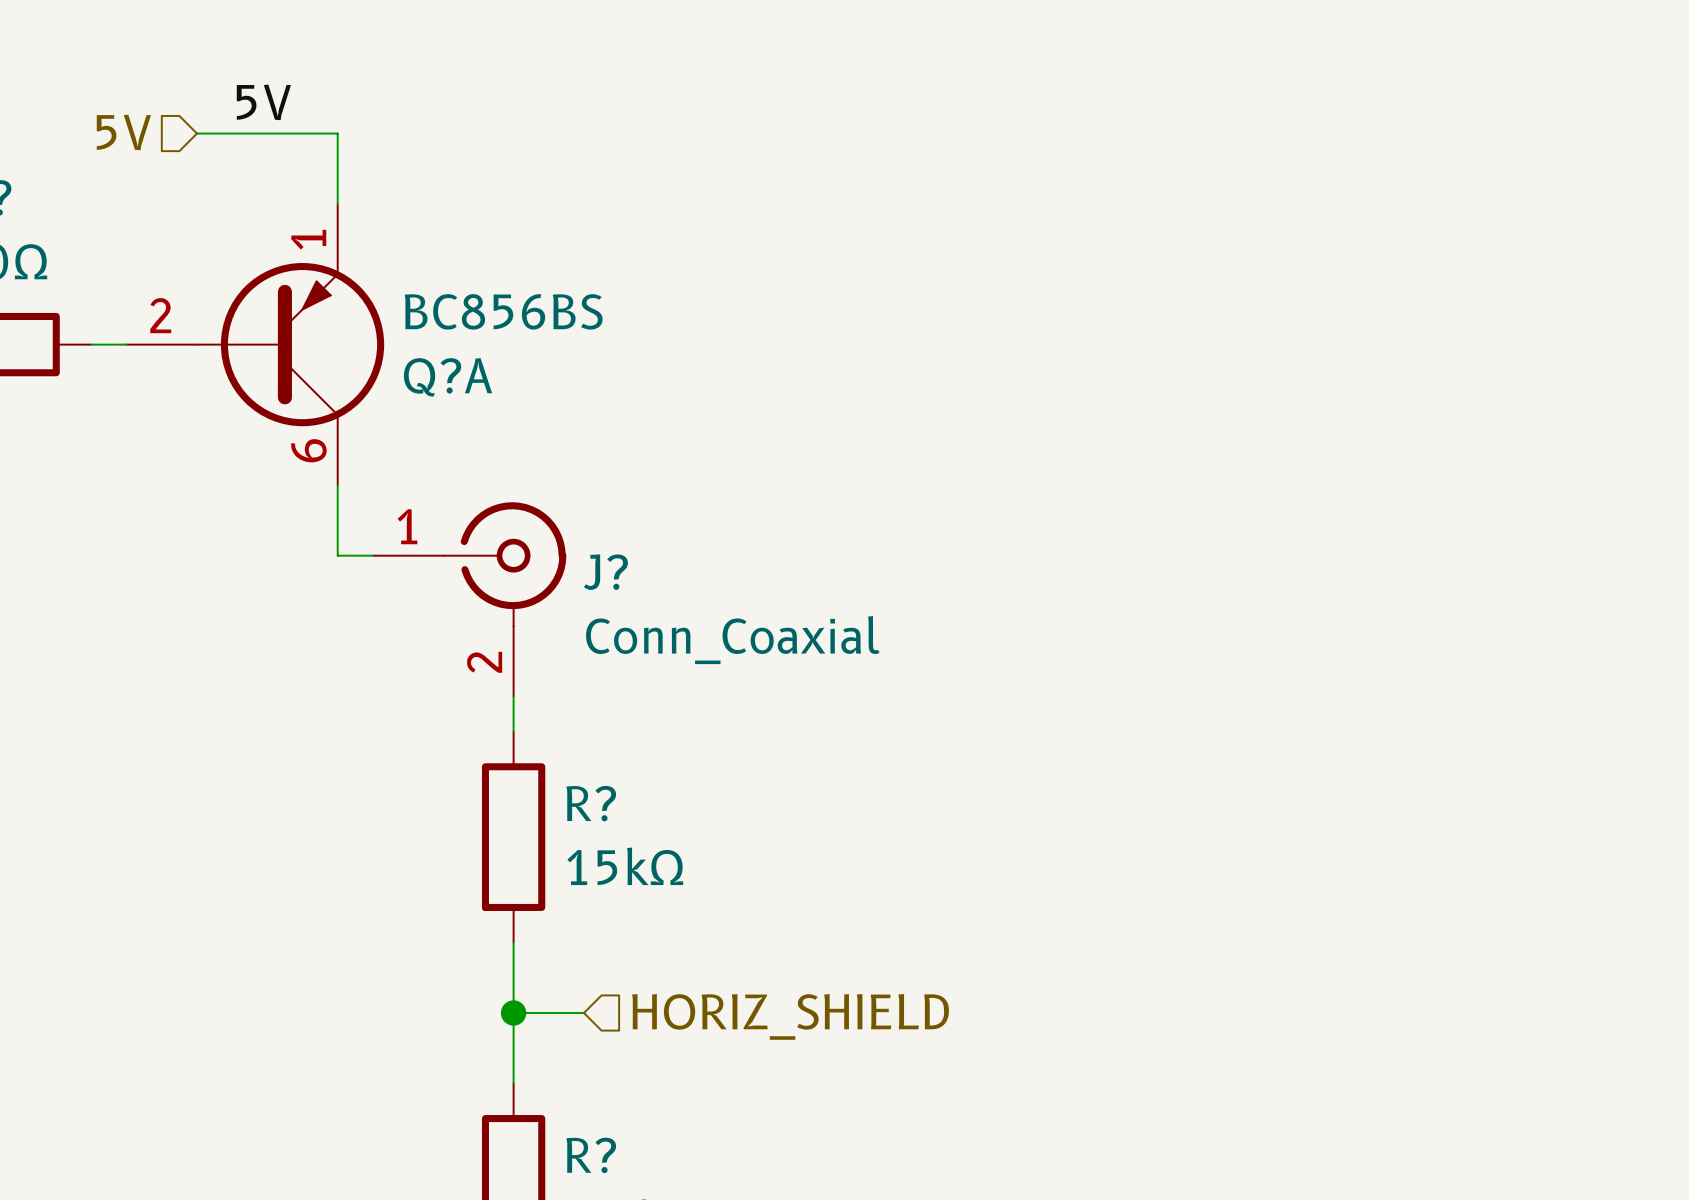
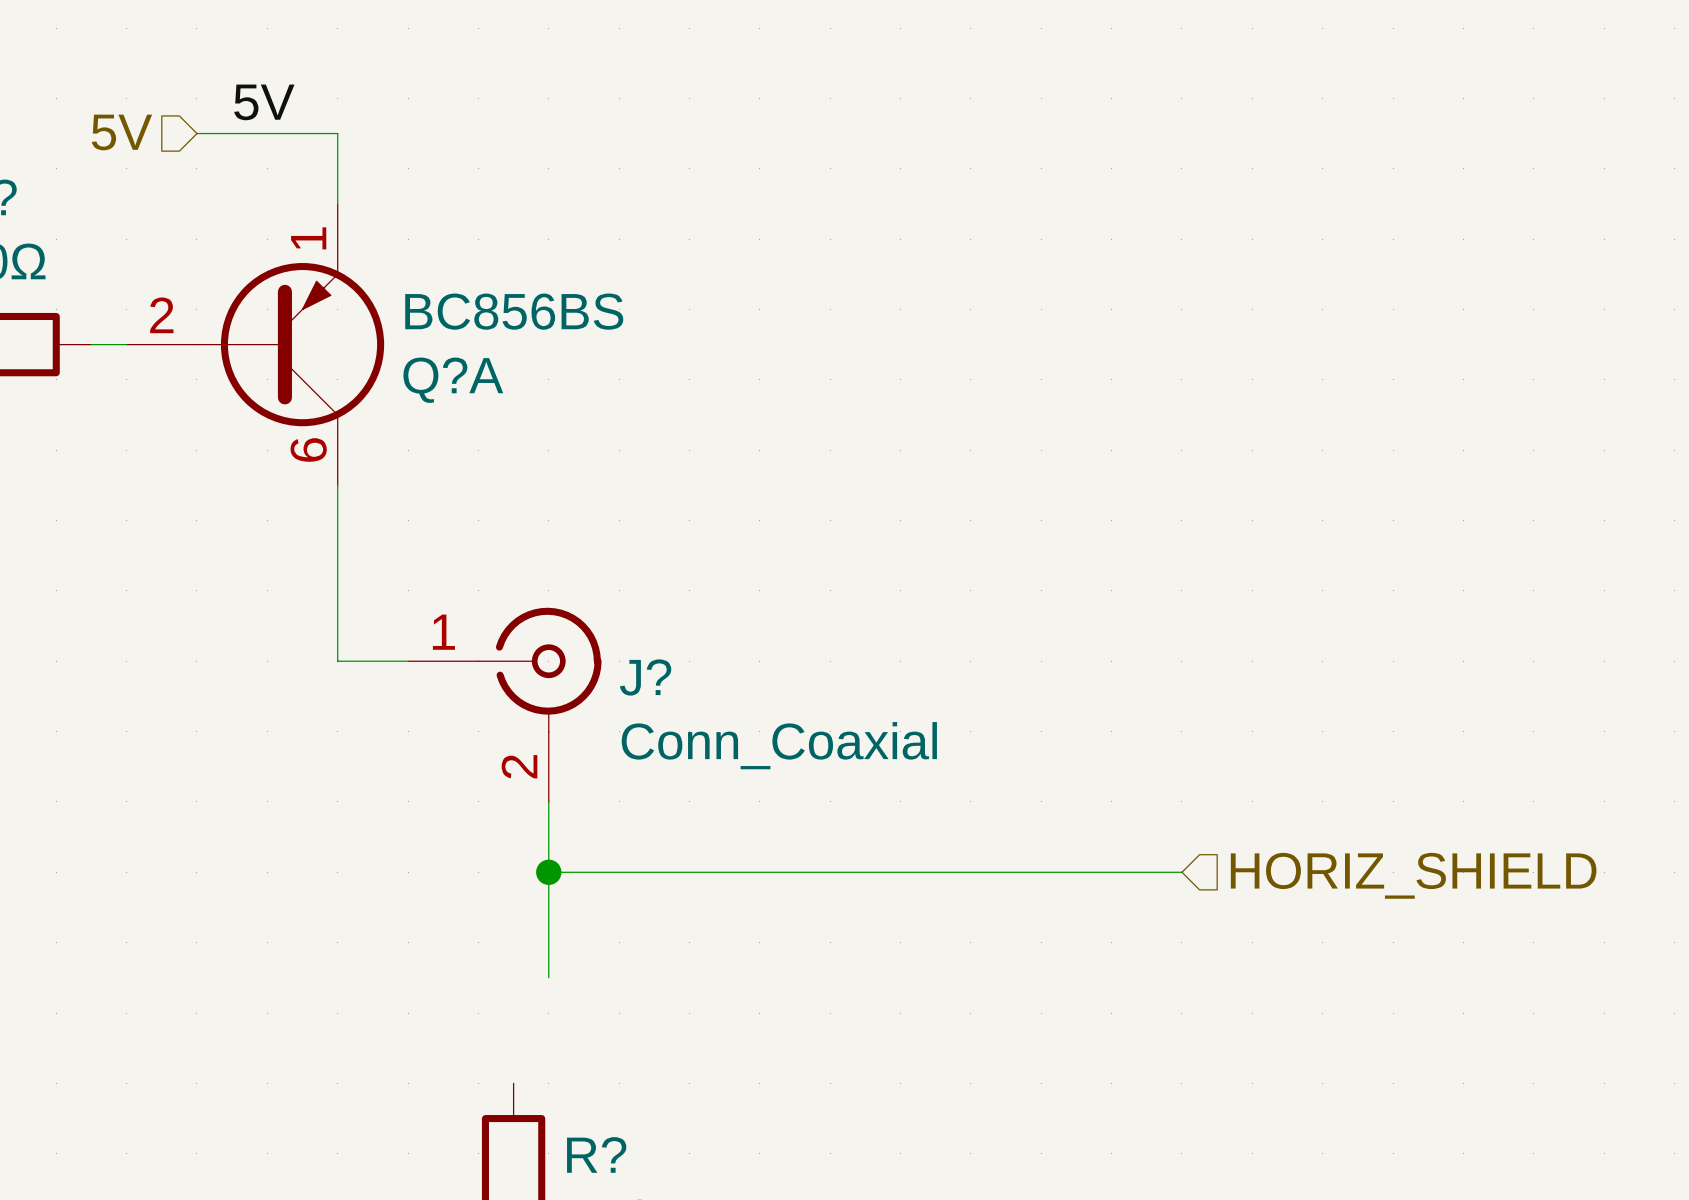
wire: (337, 555) (372, 555) -> (337, 555) (337, 661) (408, 661)
J? position: (469, 599) -> (504, 704)
wire: (513, 696) (513, 731) -> none
wire: none -> (548, 801) (548, 977)
R?: 15kΩ (513, 837) -> none
wire: none -> (548, 872) (1181, 872)
wire: (513, 942) (513, 1083) -> none
wire: (513, 1013) (583, 1013) -> none
junction position: (513, 1013) -> (548, 872)
hierarchical label position: HORIZ_SHIELD (790, 1016) -> HORIZ_SHIELD (1413, 875)

